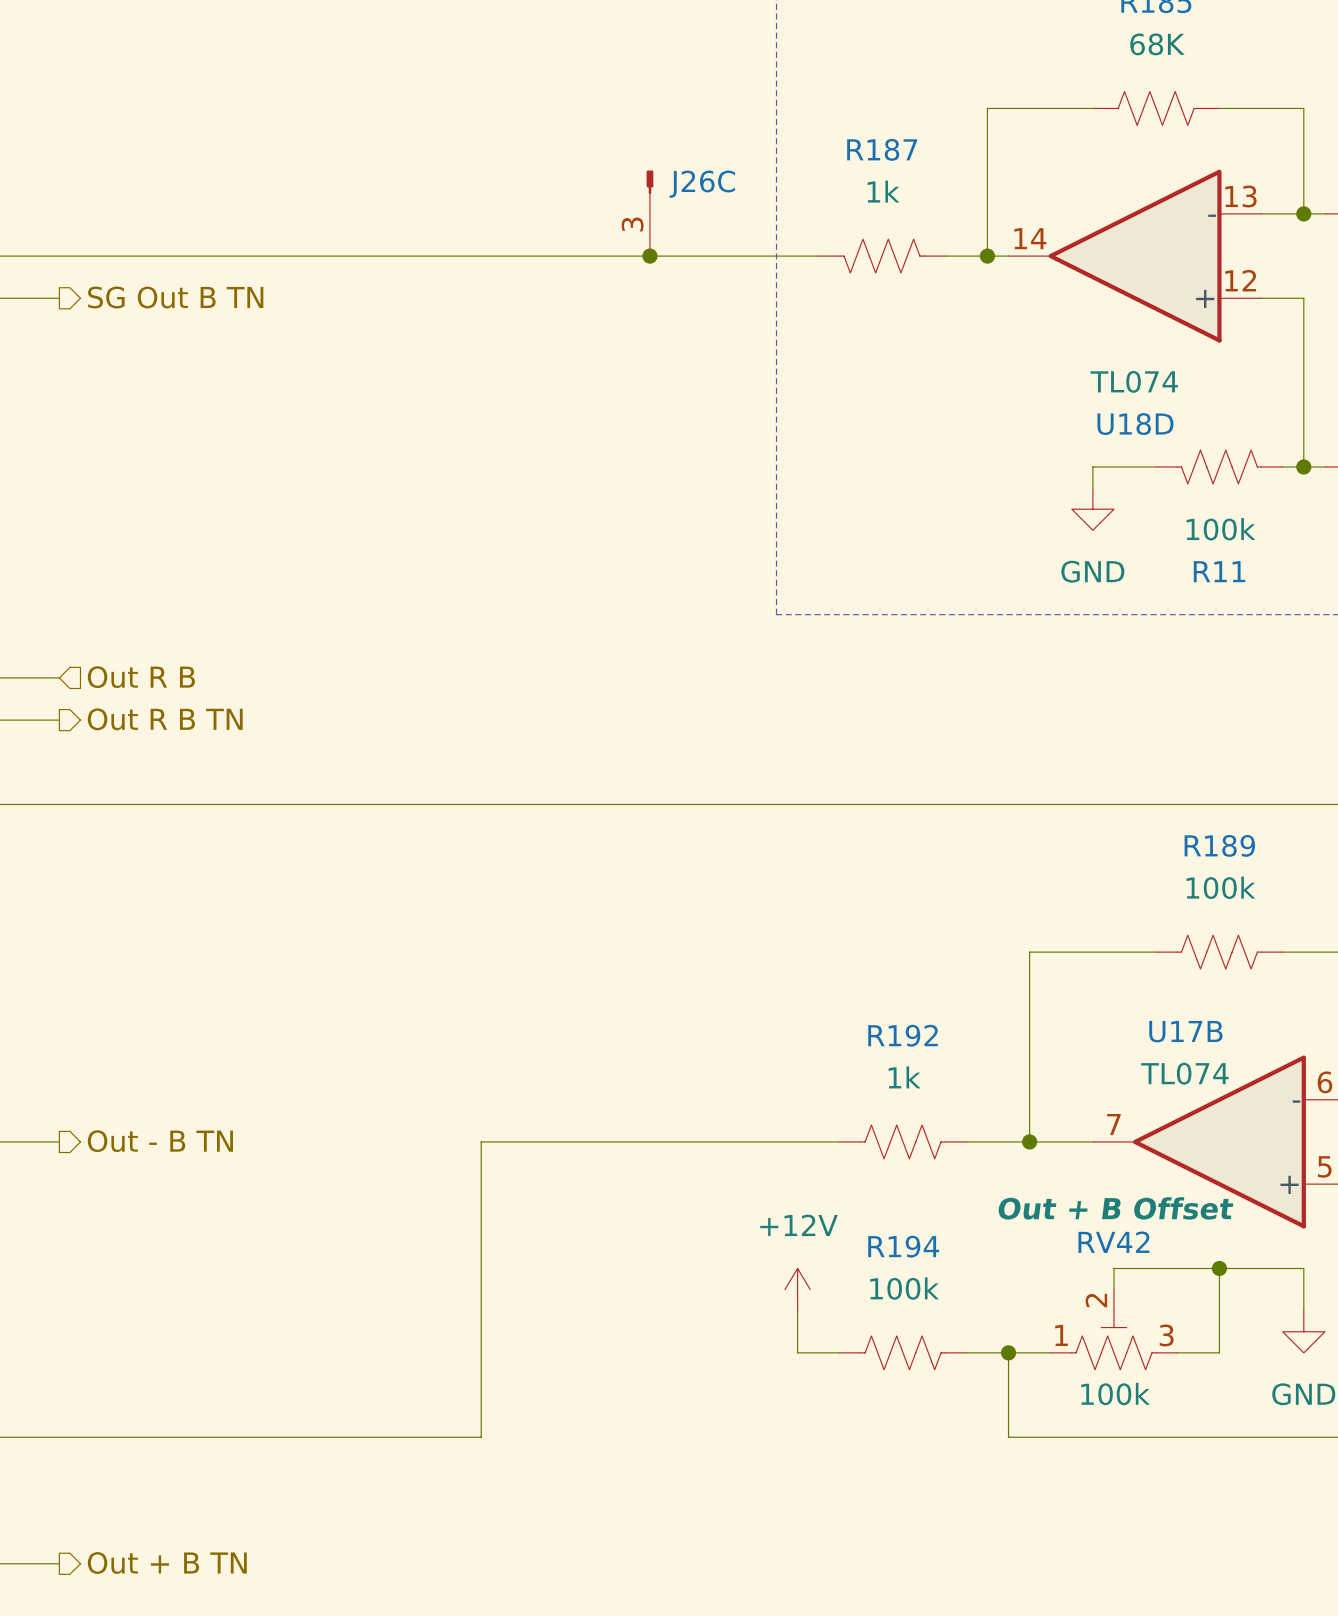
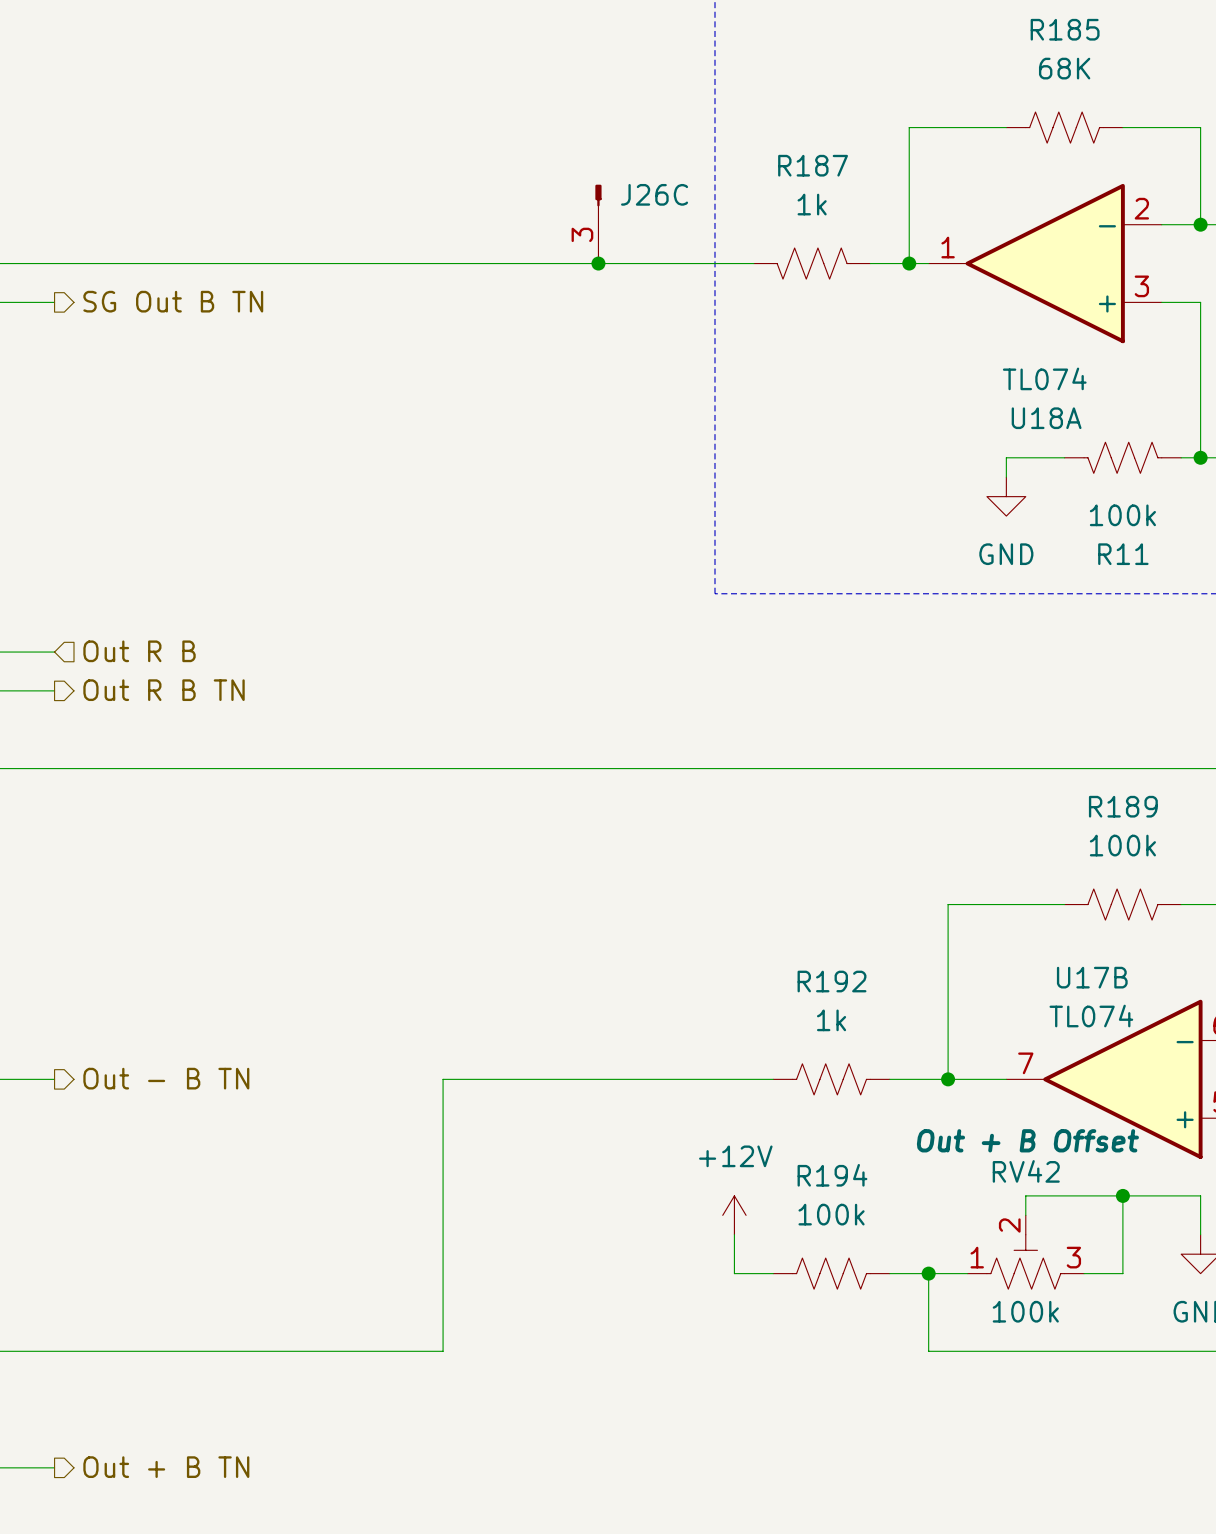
U18D pin number: 13 (1240, 196) -> 2 (1141, 208)
U18D pin number: 14 (1030, 238) -> 1 (948, 247)
U18D pin number: 12 (1240, 280) -> 3 (1141, 286)
U18D name: U18D (1135, 424) -> U18A (1046, 418)

